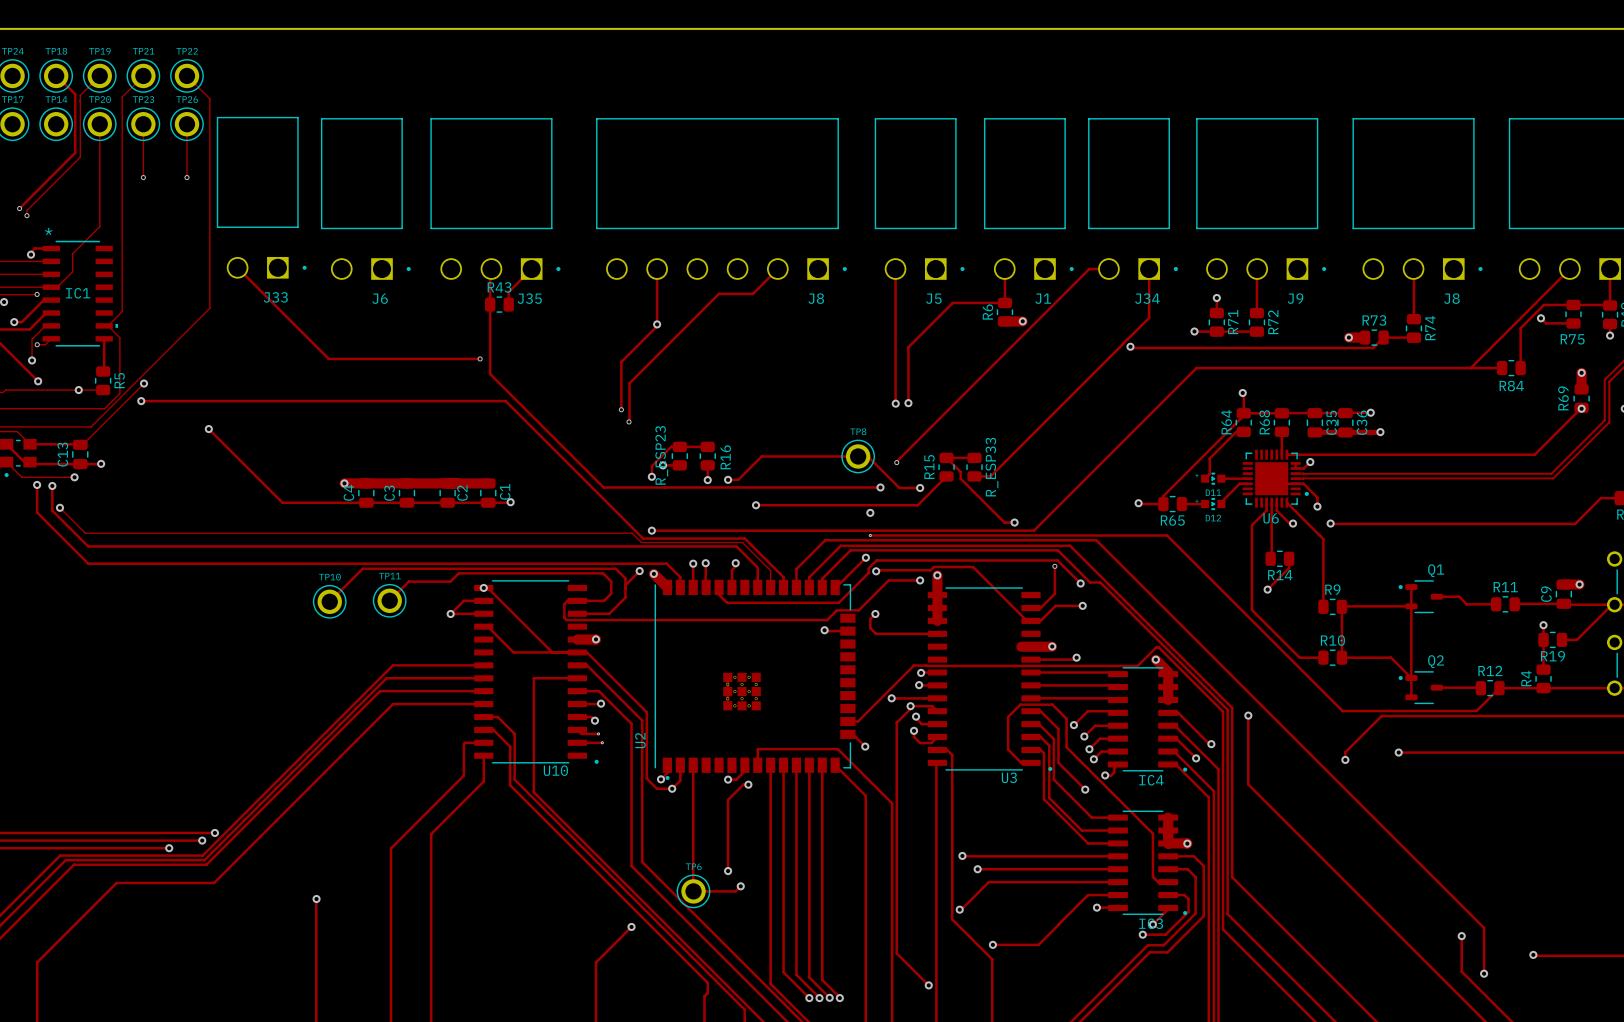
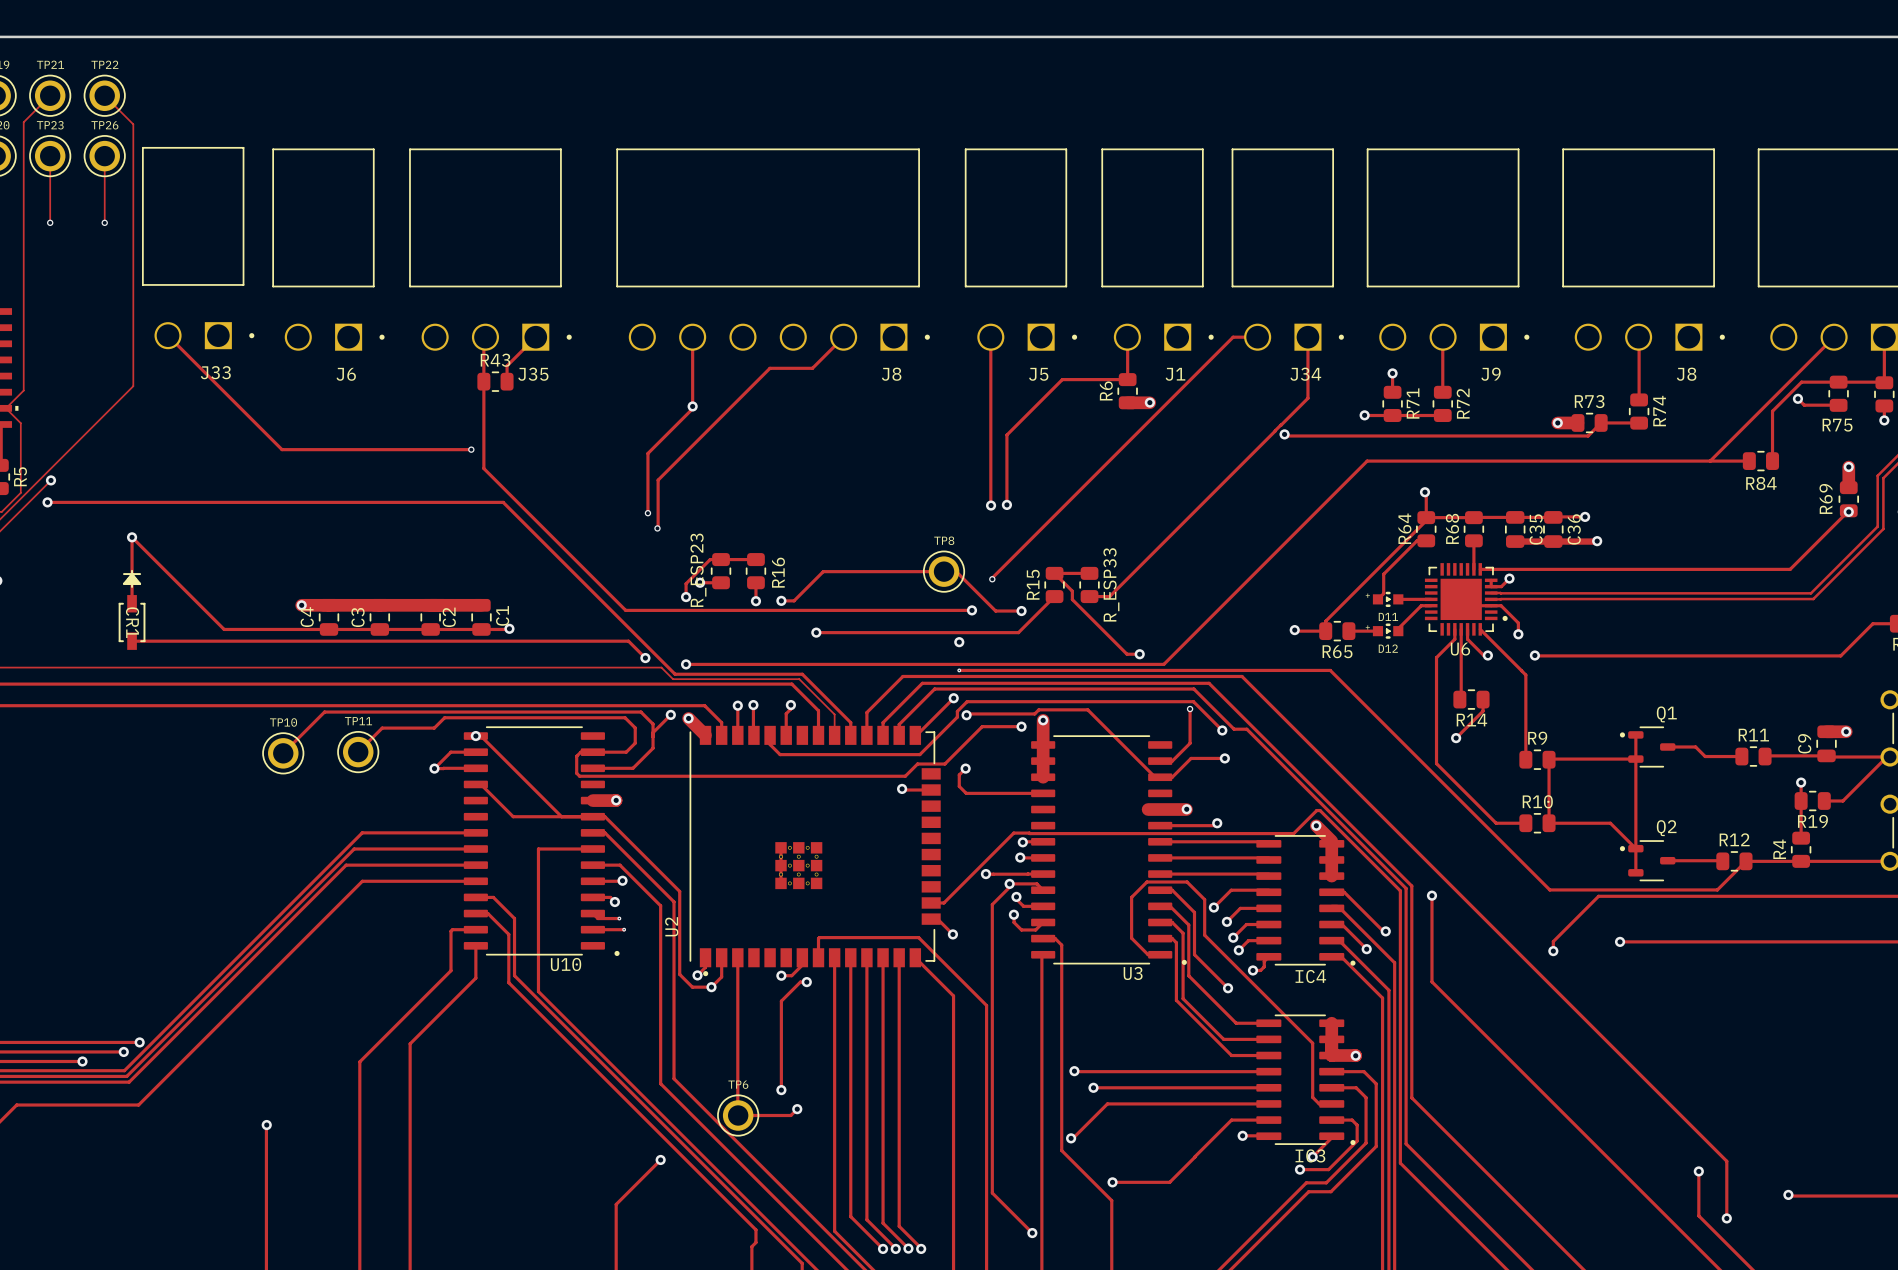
track: none -> (132, 537) (132, 603)
CR1: none -> (132, 609)
track: none -> (132, 641) (628, 641) (645, 658)
via: none -> (645, 658)

